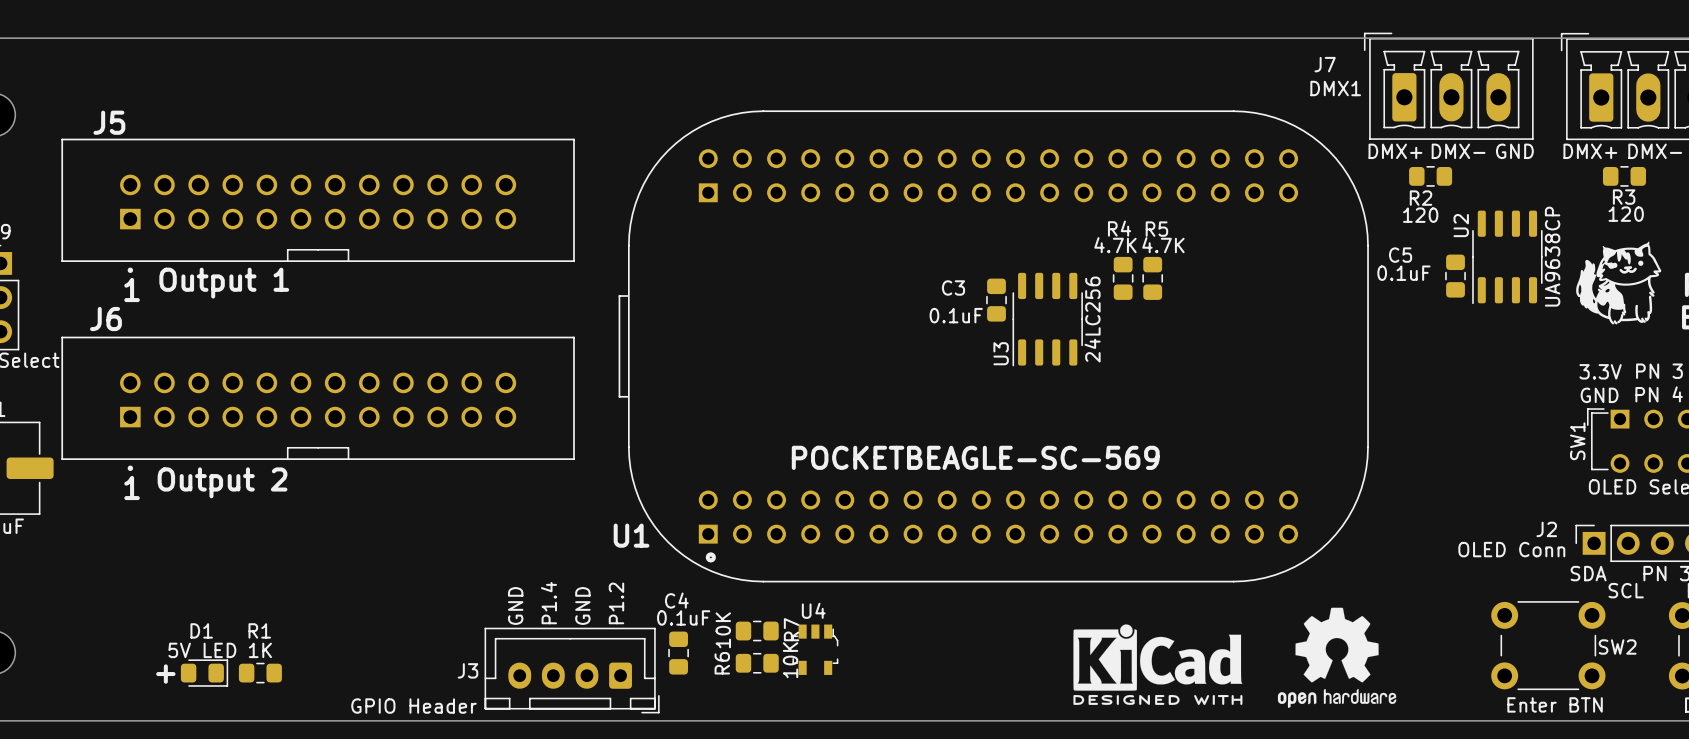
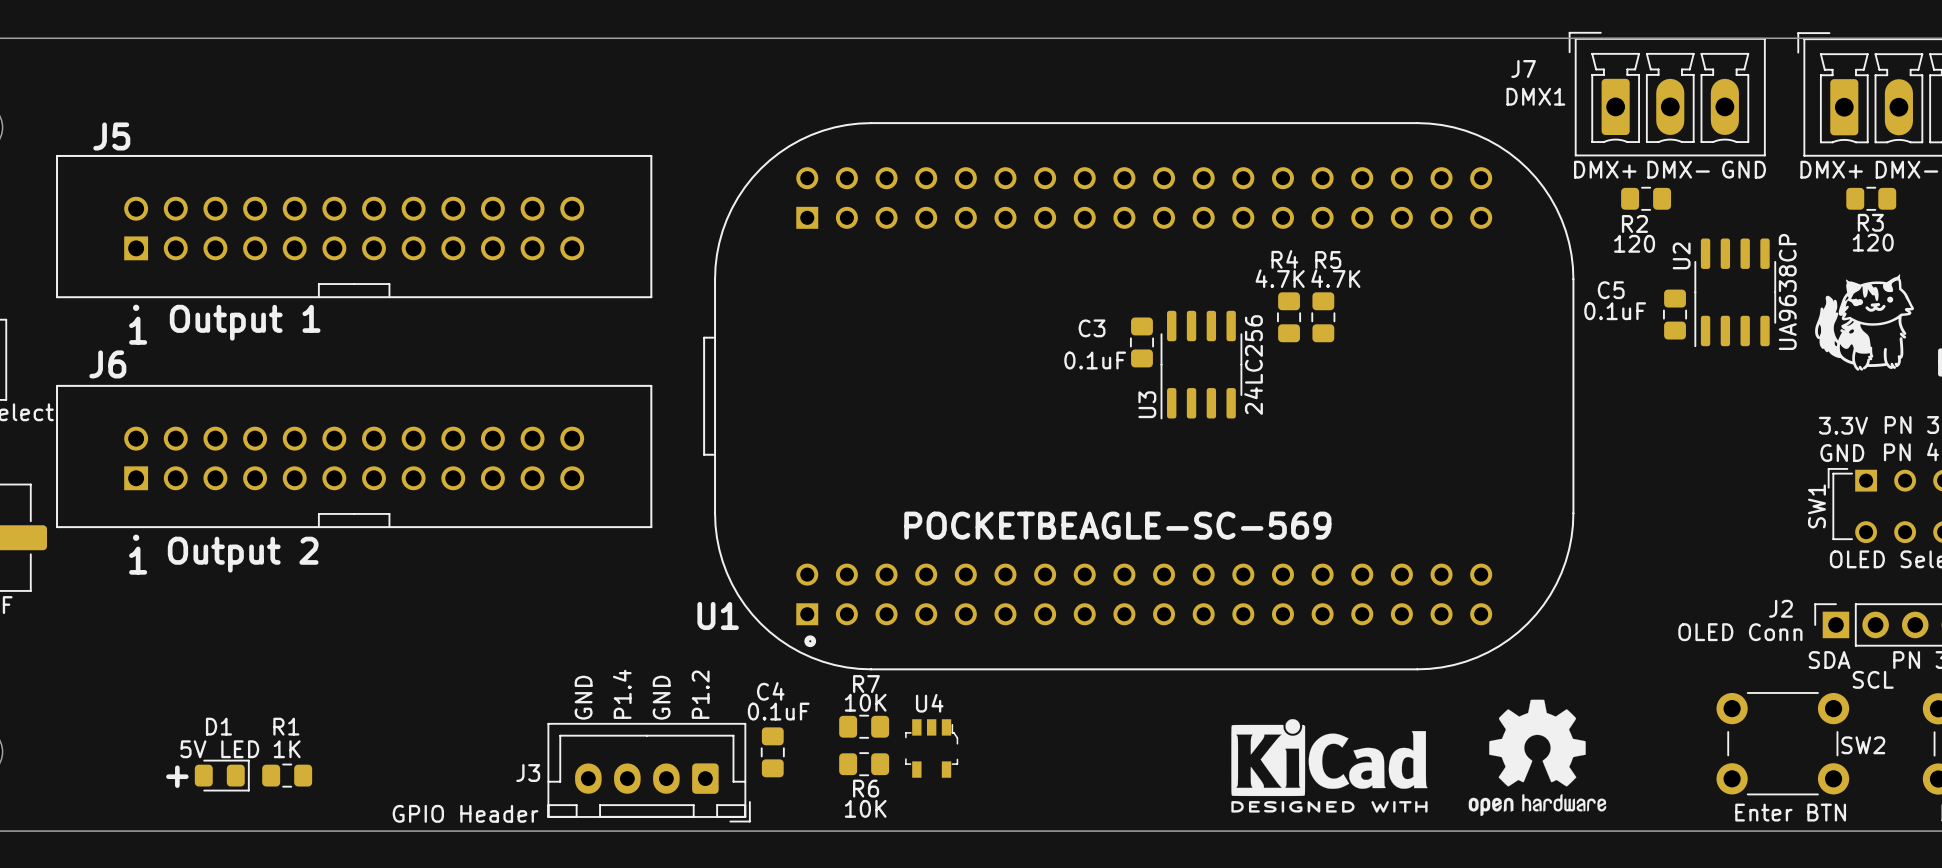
R7 name rotation: 0° (791, 629) -> 90° clockwise (866, 684)
R7 name position: R7 (791, 629) -> R7 (866, 684)
R7 value rotation: 0° (723, 630) -> 90° clockwise (865, 702)
R6 value rotation: 0° (790, 660) -> 90° clockwise (865, 808)
R6 value position: 10K (790, 660) -> 10K (865, 808)
R6 name rotation: 0° (722, 663) -> 90° clockwise (866, 788)
R6 name position: R6 (722, 663) -> R6 (866, 788)

